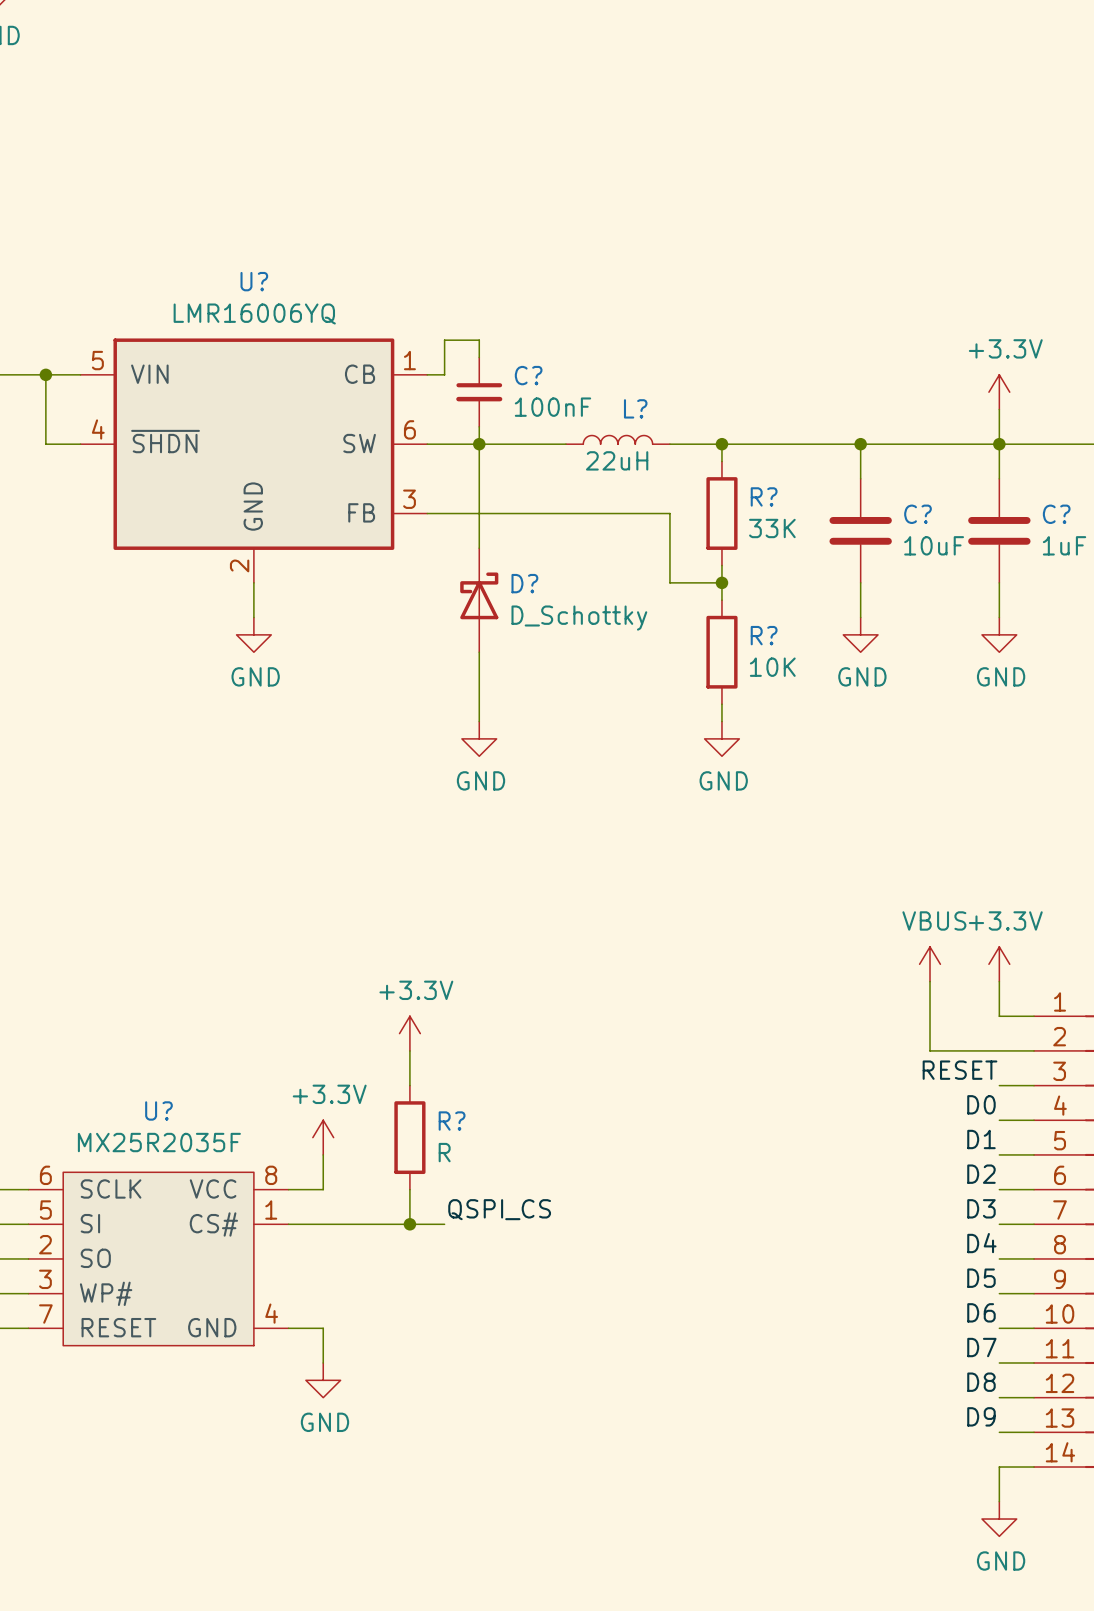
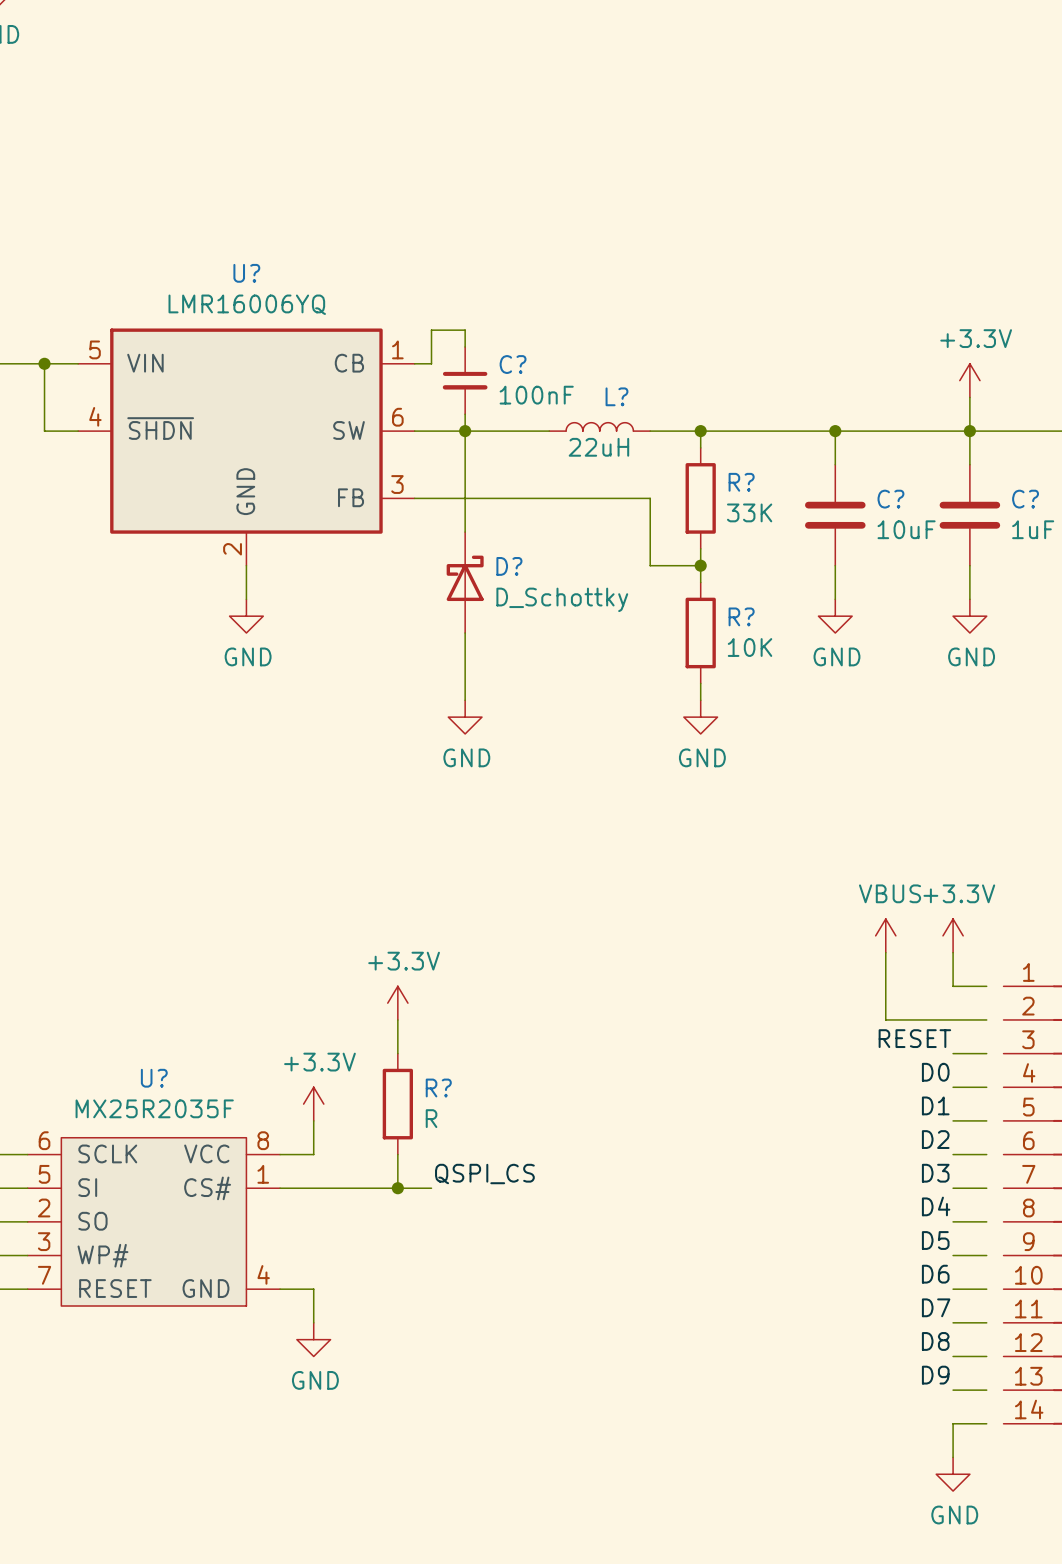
power symbol position: VBUS (930, 964) -> VBUS (885, 935)
power symbol position: +3.3V (999, 964) -> +3.3V (953, 935)
wire: (930, 981) (930, 1050) -> (885, 952) (885, 1019) (902, 1019)
wire: (999, 981) (999, 1016) -> (953, 952) (953, 986) (969, 986)
wire: (1016, 1016) (1034, 1016) -> none
wire: (1016, 1050) (1034, 1050) -> none
label position: RESET (960, 1070) -> RESET (914, 1038)
wire: (1016, 1085) (1034, 1085) -> (953, 1053) (969, 1053)
label position: D0 (981, 1104) -> D0 (935, 1072)
wire: (1016, 1120) (1034, 1120) -> (953, 1087) (969, 1087)
label position: D1 (981, 1139) -> D1 (935, 1105)
wire: (1016, 1154) (1034, 1154) -> (953, 1120) (969, 1120)
label position: D2 (981, 1174) -> D2 (935, 1139)
wire: (1016, 1189) (1034, 1189) -> (953, 1154) (969, 1154)
label position: D3 (981, 1208) -> D3 (935, 1173)
wire: (1016, 1224) (1034, 1224) -> (953, 1188) (969, 1188)
label position: D4 (981, 1243) -> D4 (936, 1206)
wire: (1016, 1258) (1034, 1258) -> (953, 1221) (969, 1221)
label position: D5 (981, 1278) -> D5 (935, 1240)
wire: (1016, 1293) (1034, 1293) -> (953, 1255) (969, 1255)
label position: D6 (981, 1312) -> D6 (935, 1274)
wire: (1016, 1328) (1034, 1328) -> (953, 1289) (969, 1289)
label position: D7 (981, 1347) -> D7 (936, 1307)
wire: (1016, 1362) (1034, 1362) -> (953, 1322) (969, 1322)
label position: D8 (981, 1382) -> D8 (935, 1341)
wire: (1016, 1397) (1034, 1397) -> (953, 1356) (969, 1356)
label position: D9 (981, 1416) -> D9 (935, 1375)
wire: (1016, 1432) (1034, 1432) -> (953, 1390) (969, 1390)
wire: (999, 1467) (999, 1501) -> (969, 1423) (953, 1423) (953, 1457)
wire: (1016, 1467) (1034, 1467) -> none
power symbol position: GND (999, 1519) -> GND (953, 1474)

